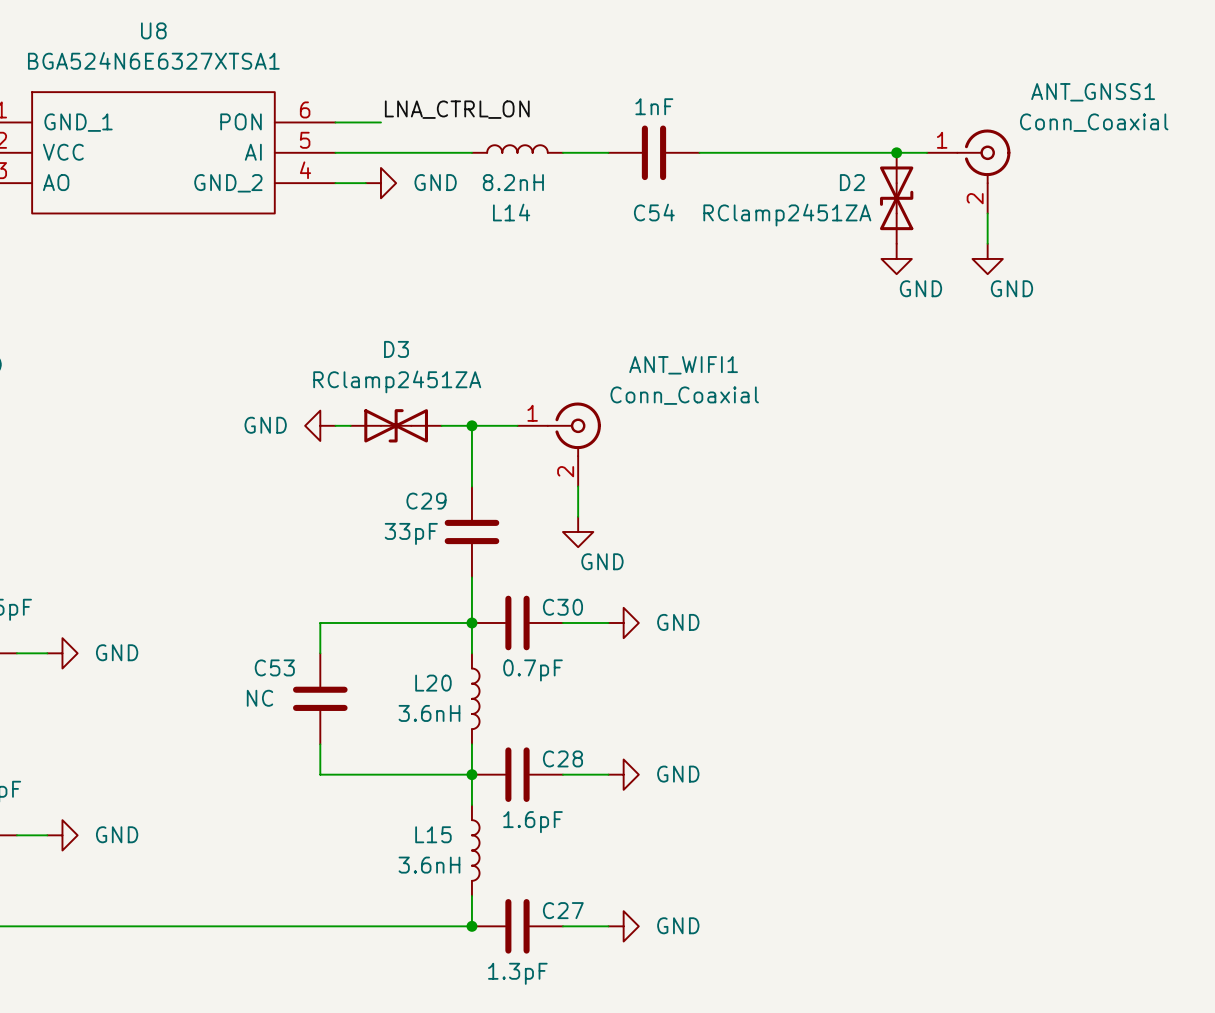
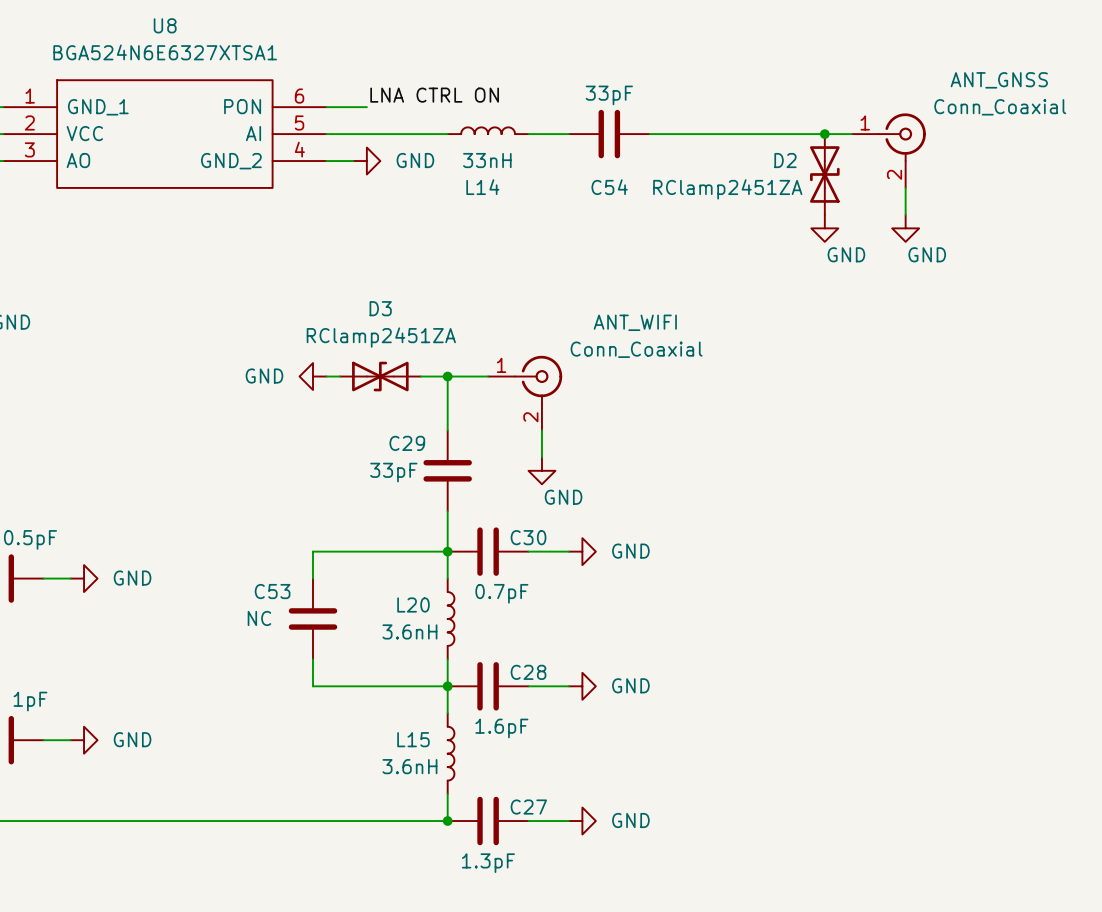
ANT_GNSS1 name: ANT_GNSS1 (1093, 92) -> ANT_GNSS (999, 80)
C54 value: 1nF (654, 106) -> 33pF (609, 95)
label: LNA_CTRL_ON (457, 109) -> LNA CTRL ON (434, 95)
L14 value: 8.2nH (513, 182) -> 33nH (487, 160)
ANT_WIFI1 name: ANT_WIFI1 (683, 365) -> ANT_WIFI (635, 322)

